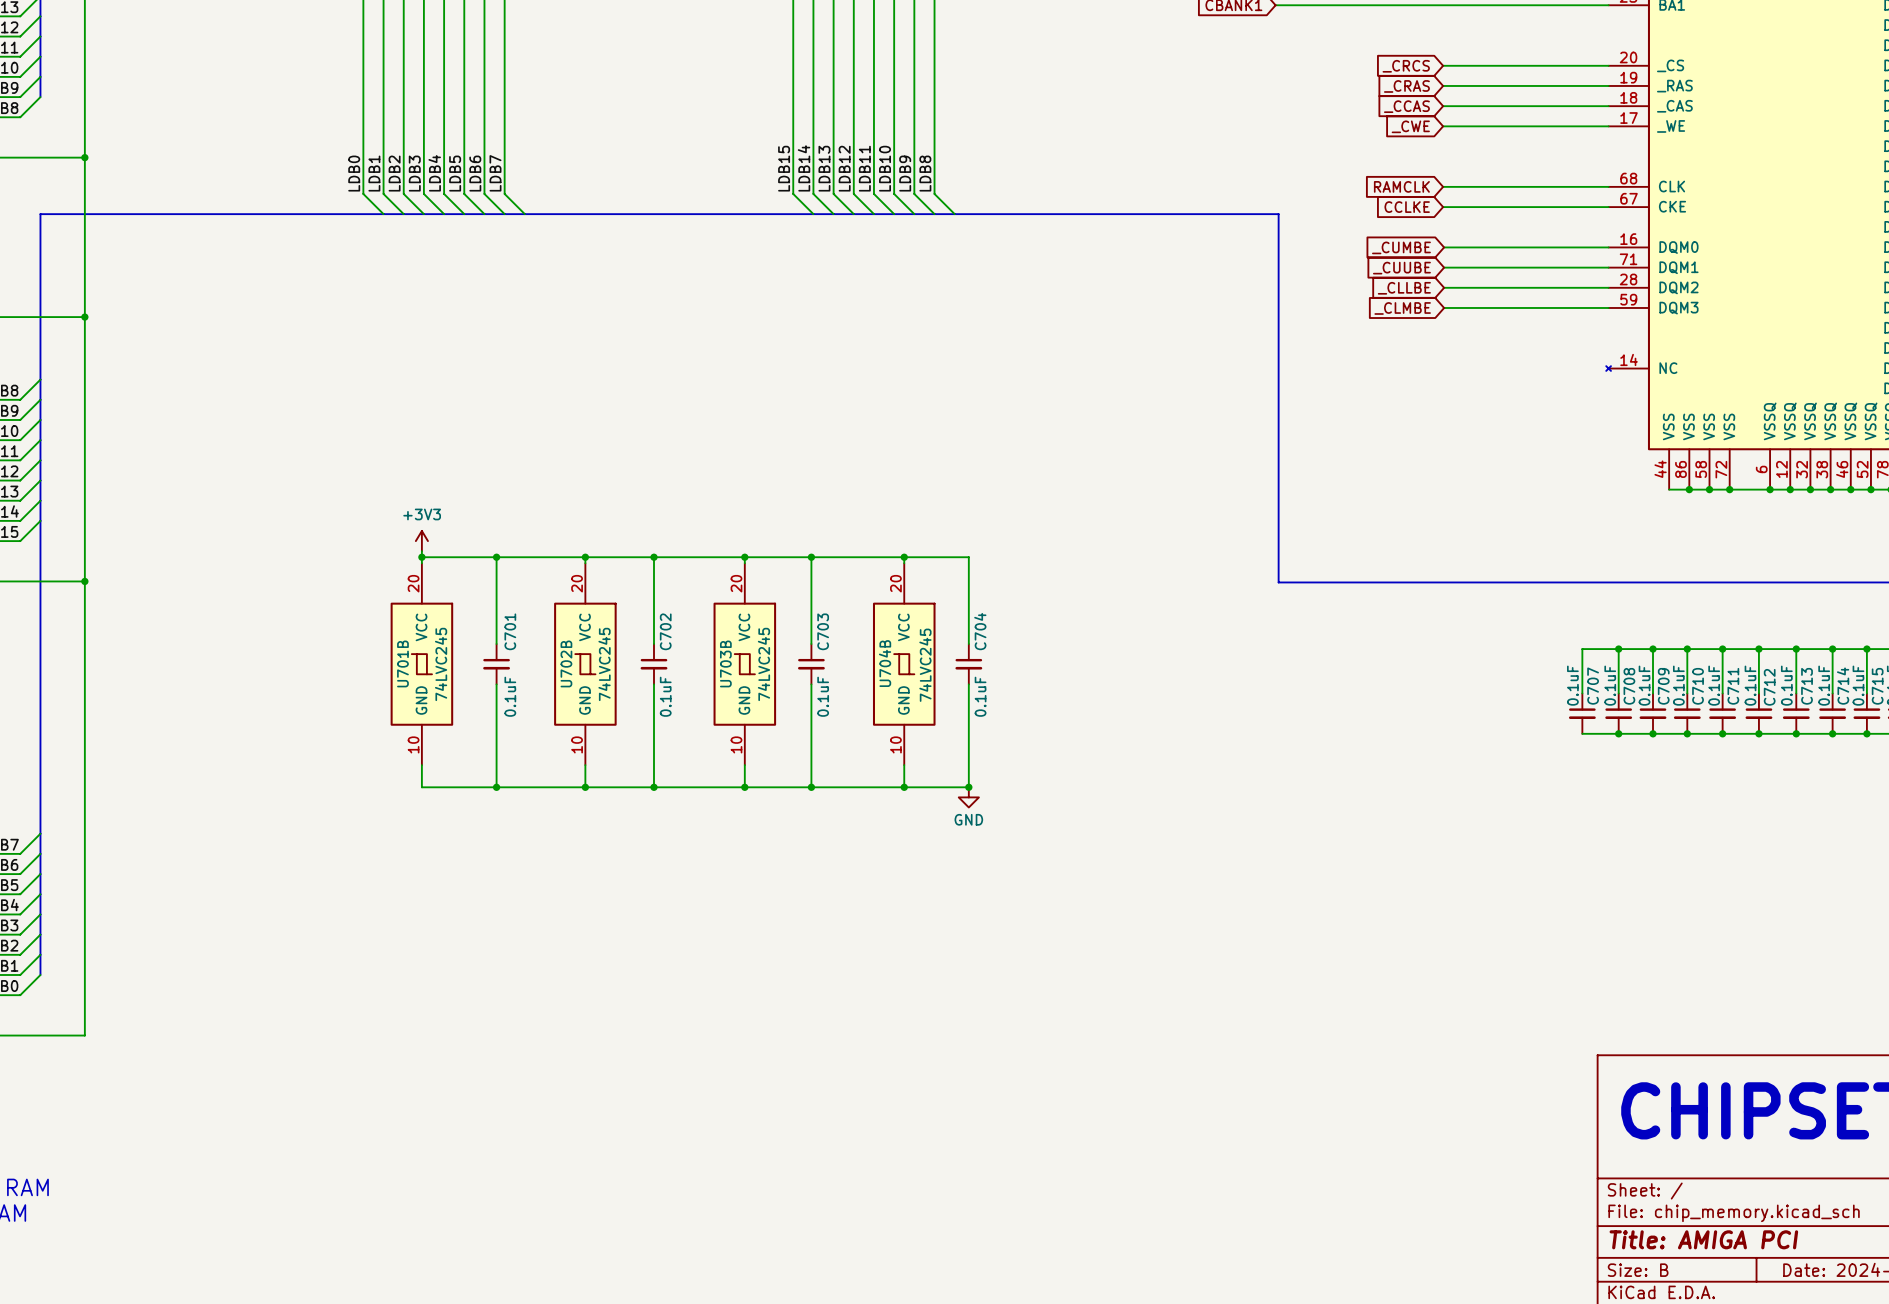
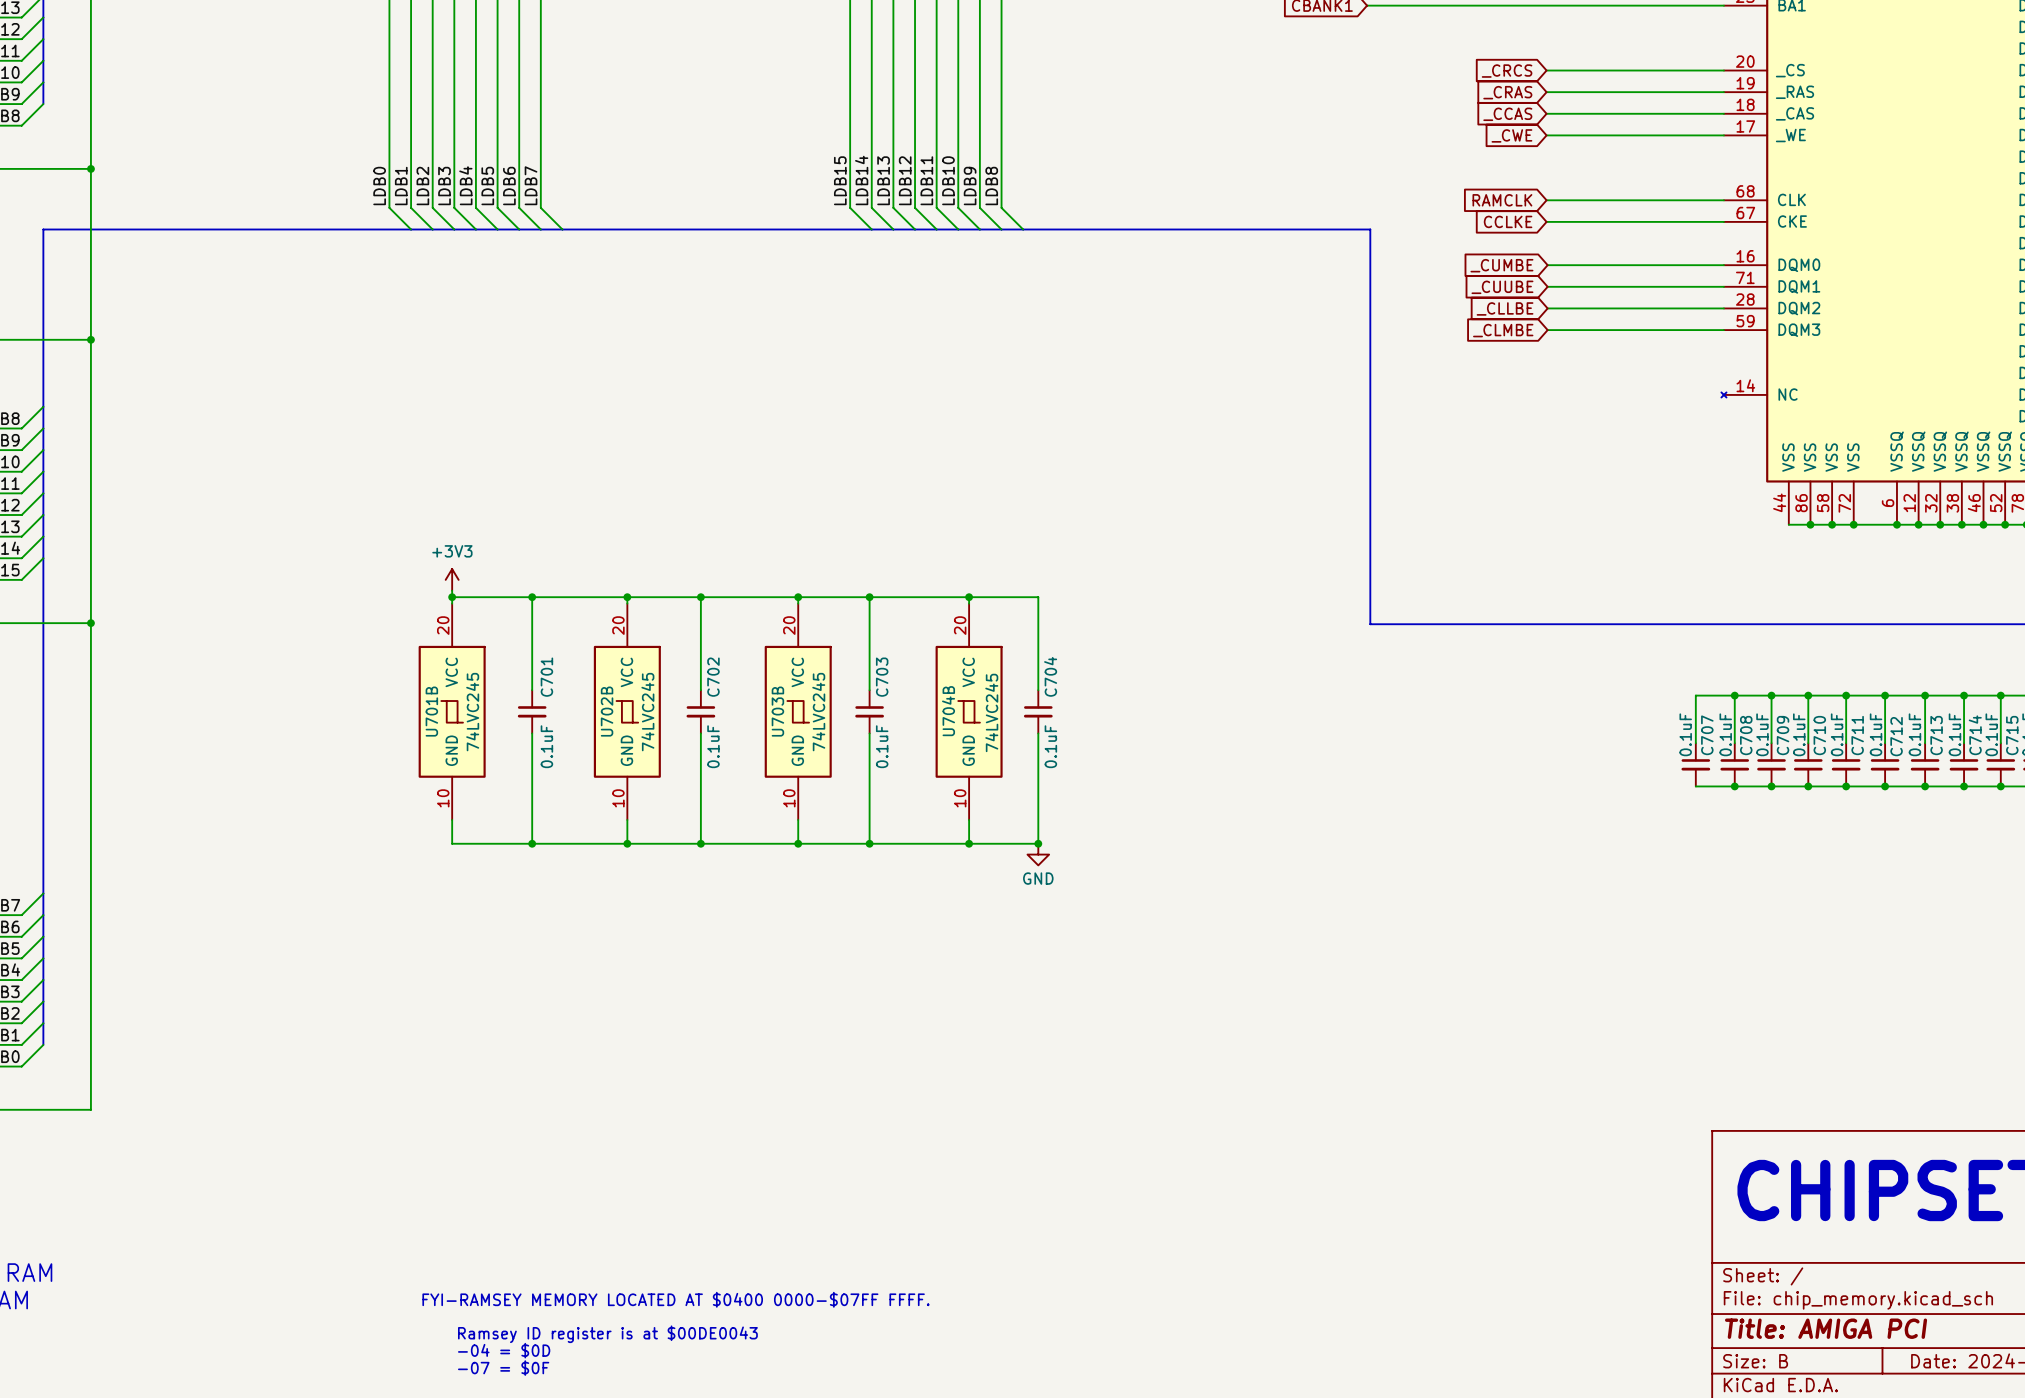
text: none -> FYI-RAMSEY MEMORY LOCATED AT $0400 0000-$07FF FFFF. (675, 1299)
text: none -> Ramsey ID register is at $00DE0043 (607, 1334)
text: none -> -04 = $0D (504, 1350)
text: none -> -07 = $0F (503, 1368)

